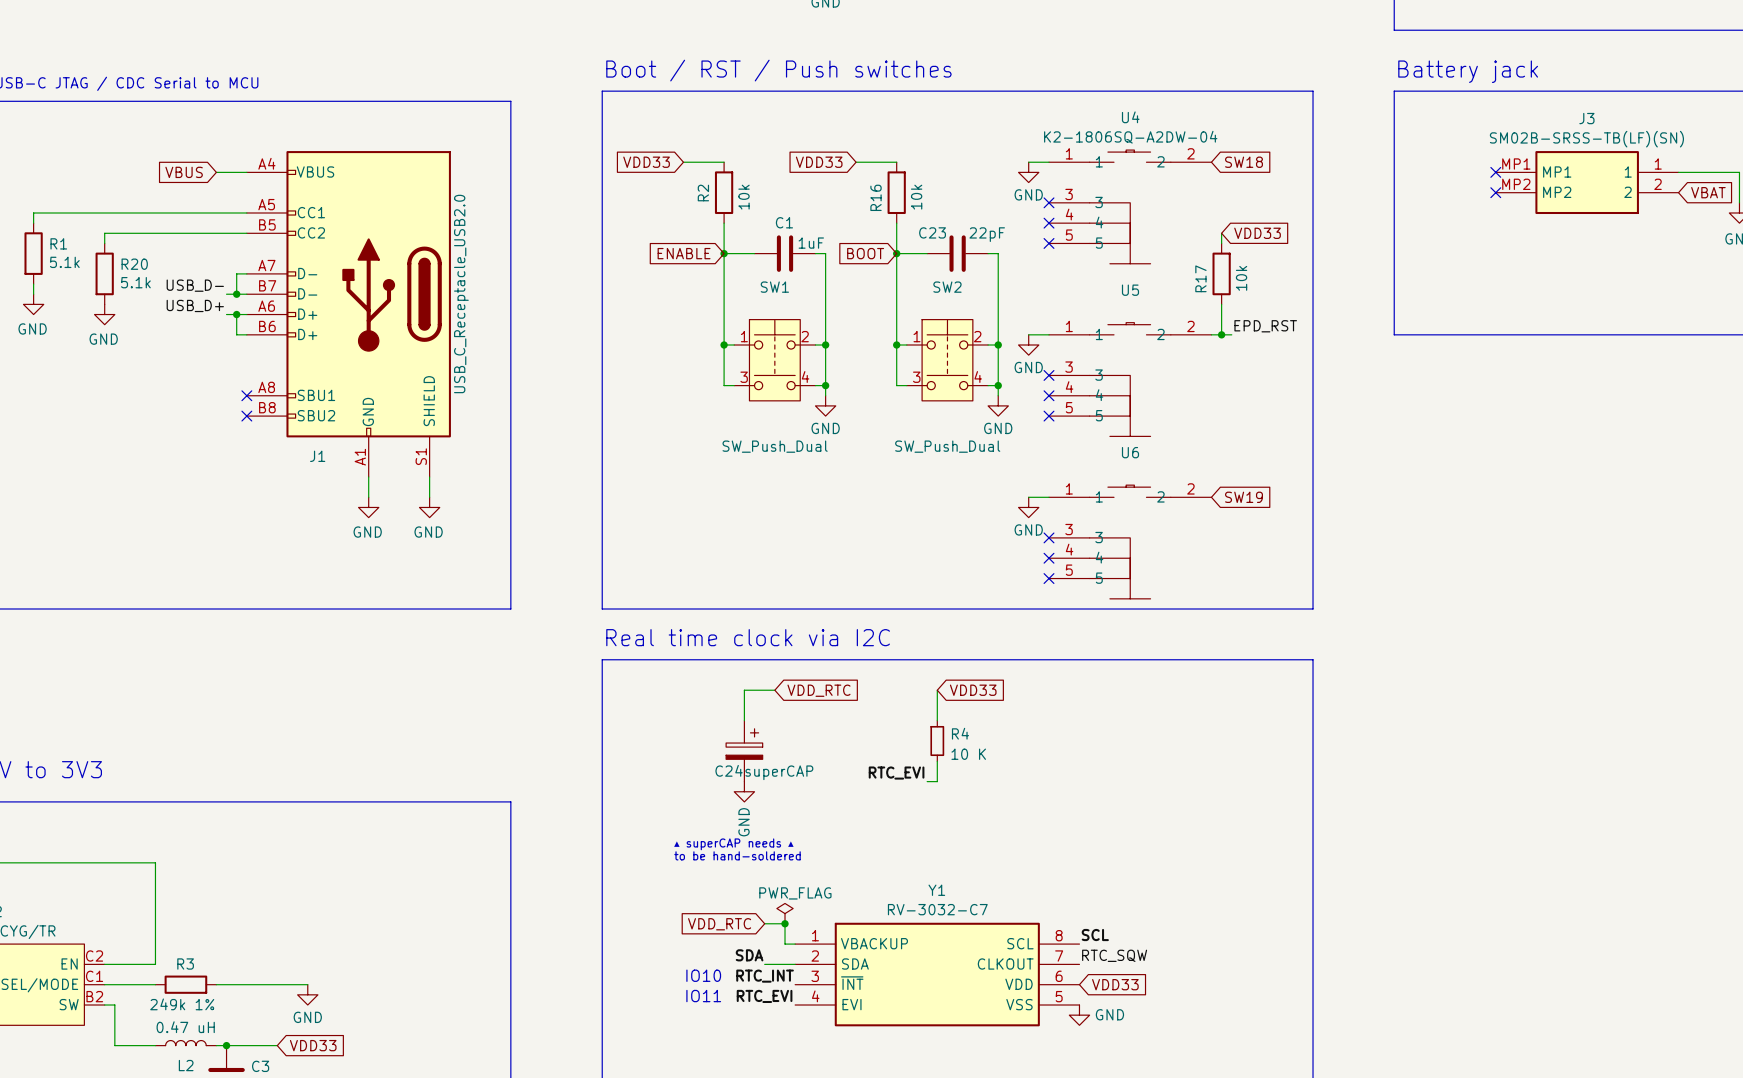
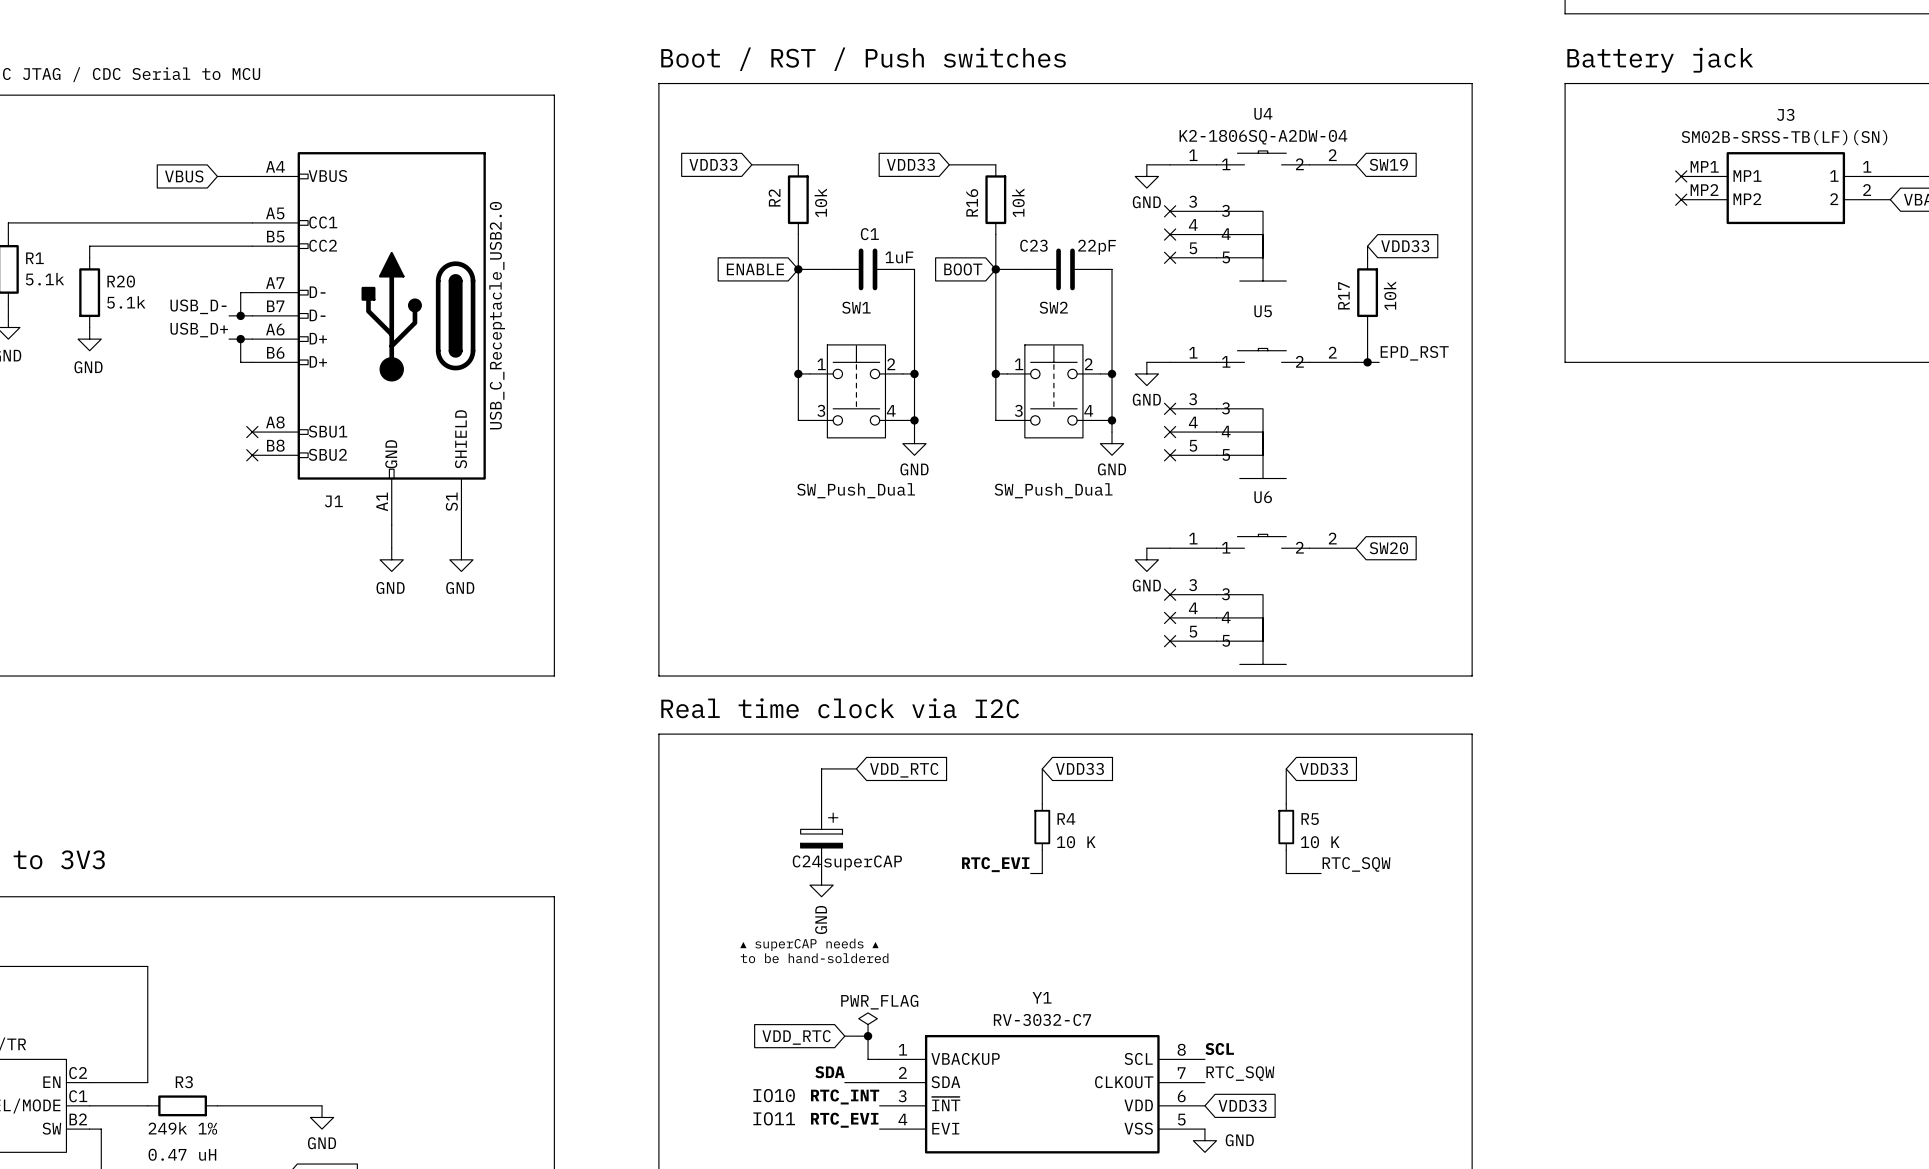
global label: SW18 (1244, 162) -> SW19 (1388, 164)
global label: SW19 (1244, 497) -> SW20 (1388, 548)
wire: none -> (1286, 768) (1286, 803)
global label: none -> VDD33 (1323, 768)
R5: none -> 10 K (1286, 827)
wire: none -> (1286, 850) (1286, 873) (1321, 873)
label: none -> RTC_SQW (1356, 864)

